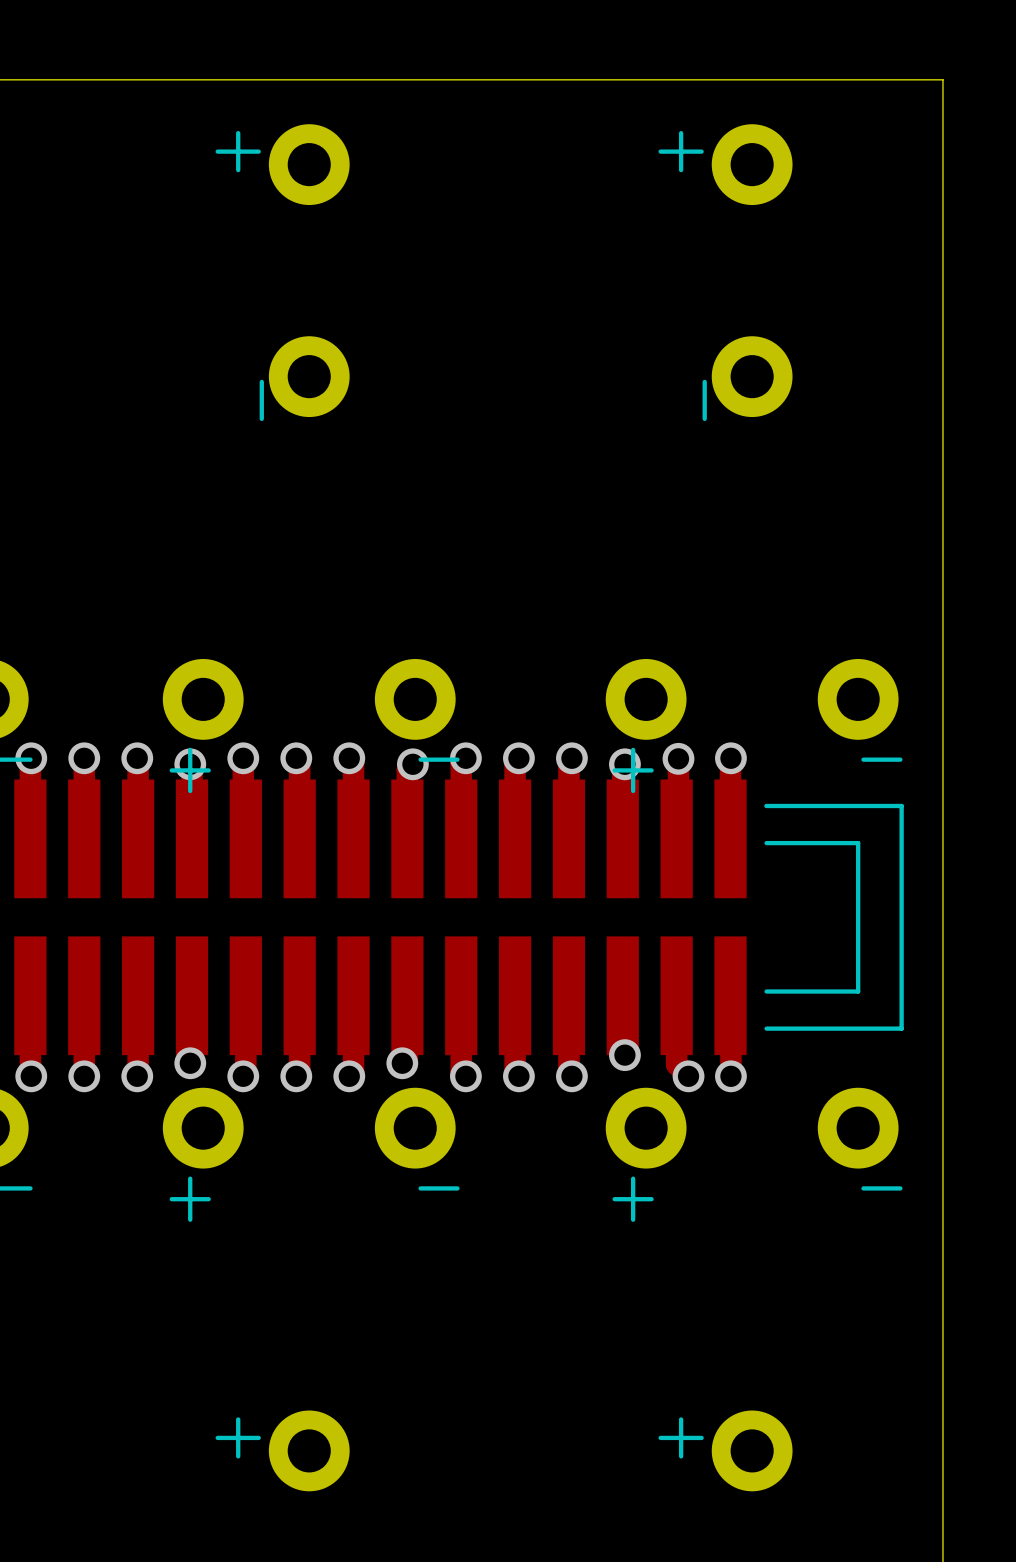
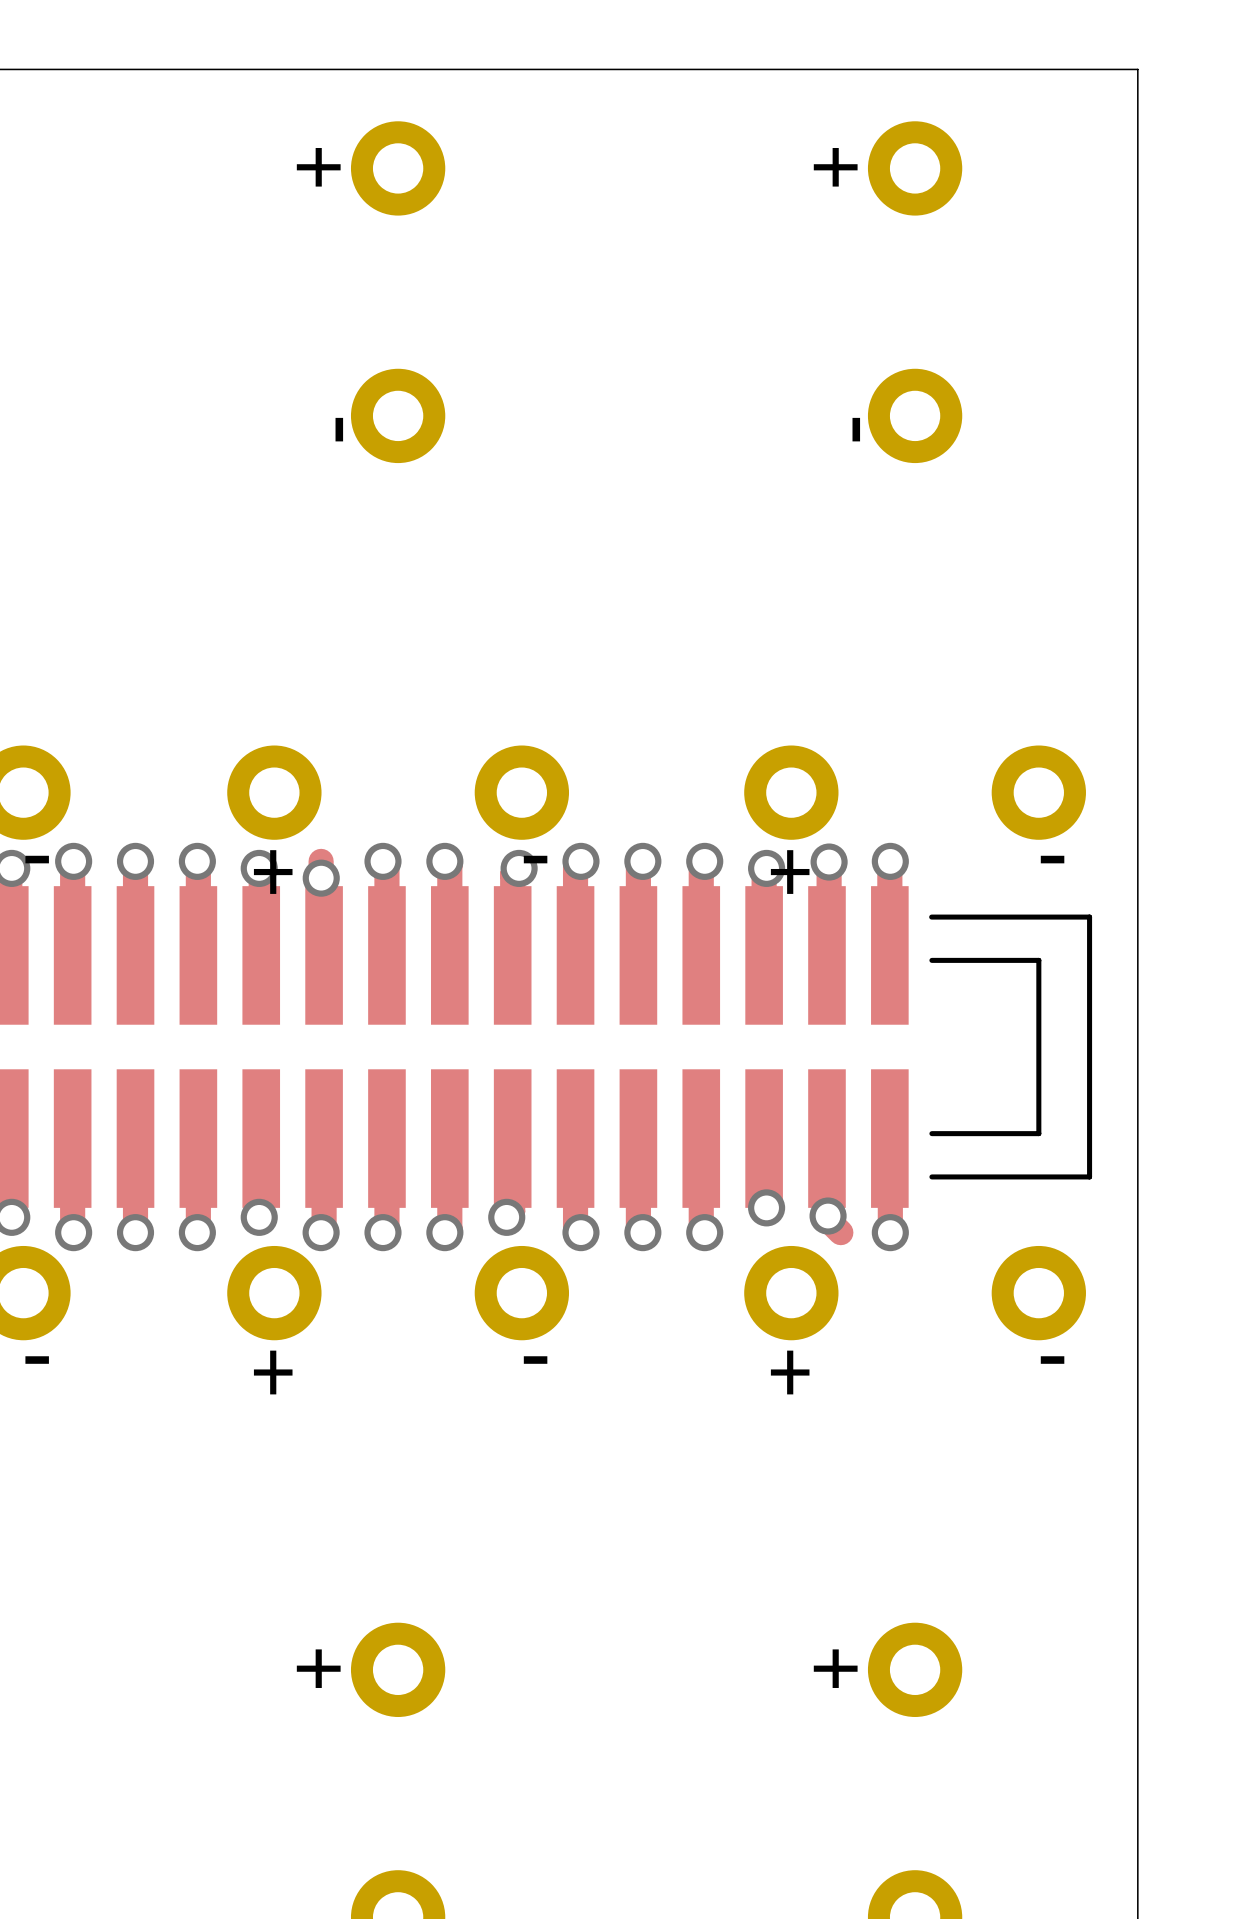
via position: (243, 758) -> (321, 878)
via position: (688, 1076) -> (828, 1216)

